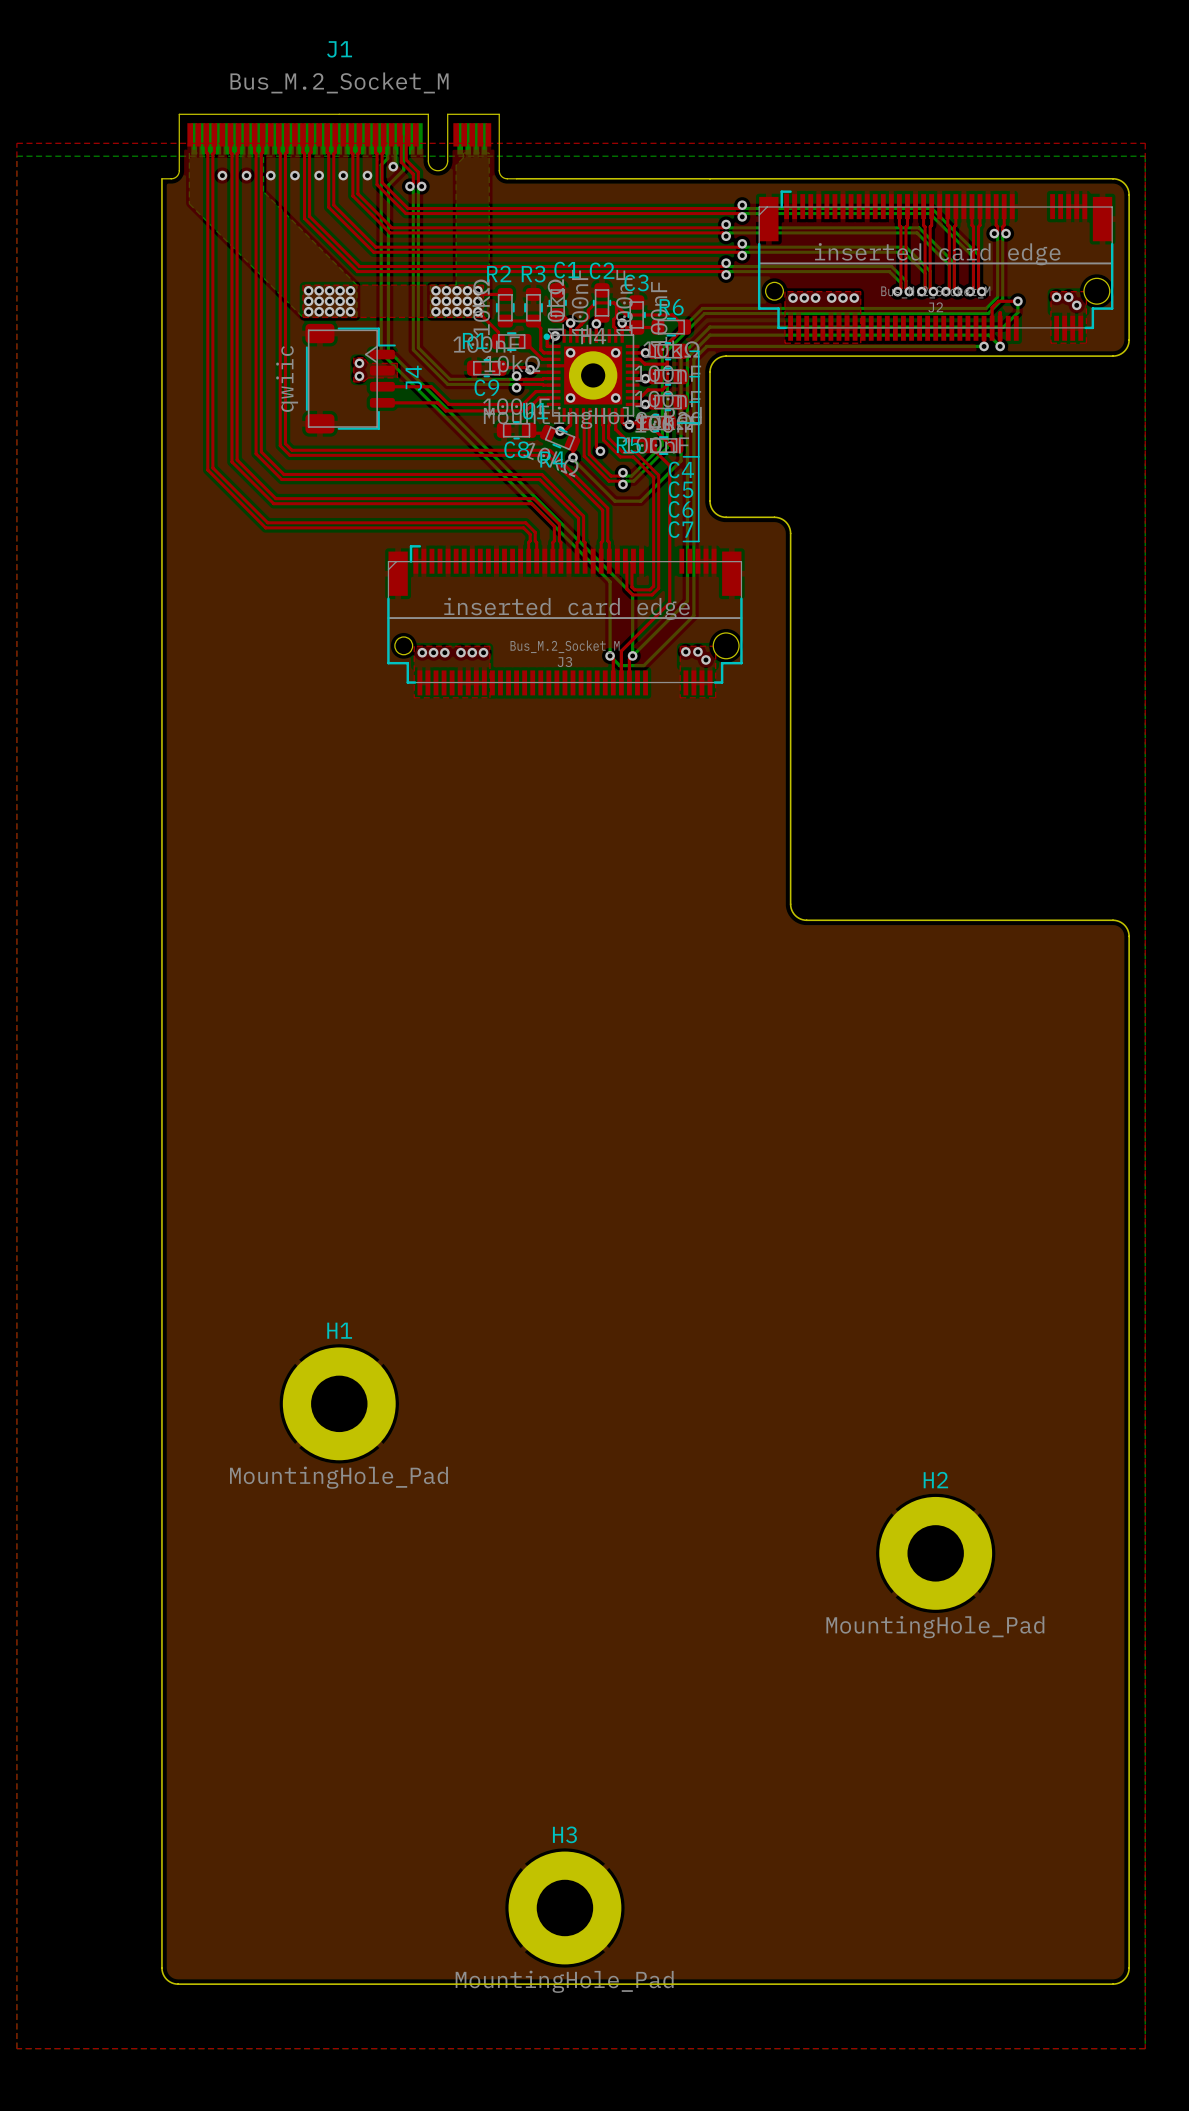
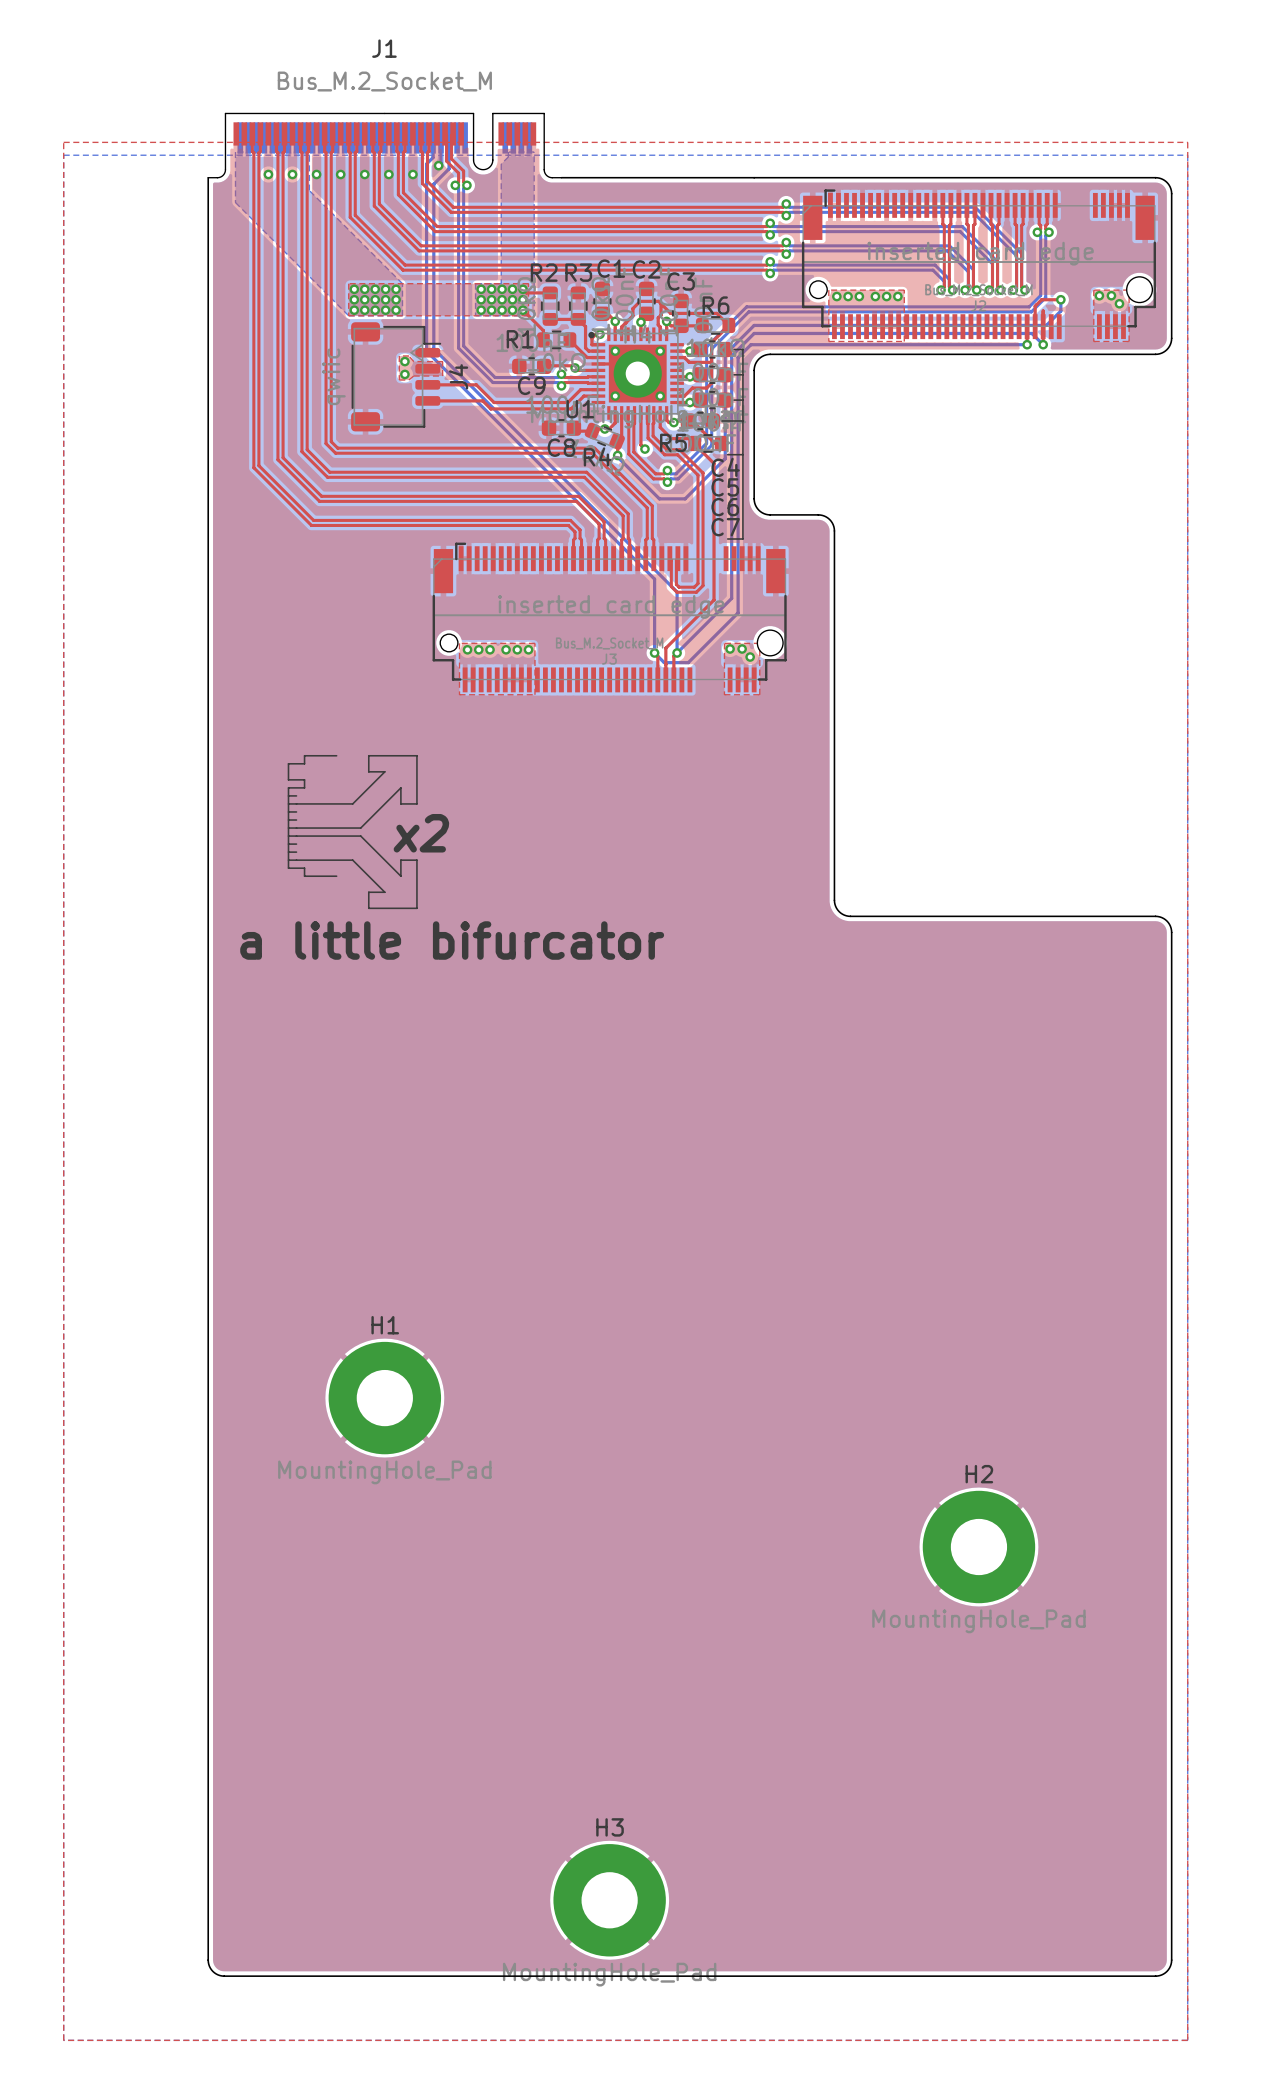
line: none -> (336, 755) (304, 755) (304, 763) (288, 763) (288, 779) (304, 779) (304, 787) (288, 787) (288, 868) (304, 868) (304, 876) (336, 876)
line: none -> (288, 795) (296, 795)
line: none -> (288, 803) (352, 803) (384, 771) (368, 771) (368, 755) (416, 755) (416, 803) (400, 803) (400, 787) (360, 828) (288, 828)
line: none -> (288, 811) (296, 811)
line: none -> (288, 820) (296, 820)
text: none -> x2 (421, 833)
line: none -> (288, 836) (360, 836) (400, 876) (400, 860) (416, 860) (416, 908) (368, 908) (368, 892) (384, 892) (352, 860) (288, 860)
line: none -> (288, 844) (296, 844)
line: none -> (288, 852) (296, 852)
text: none -> a little bifurcator (452, 940)

